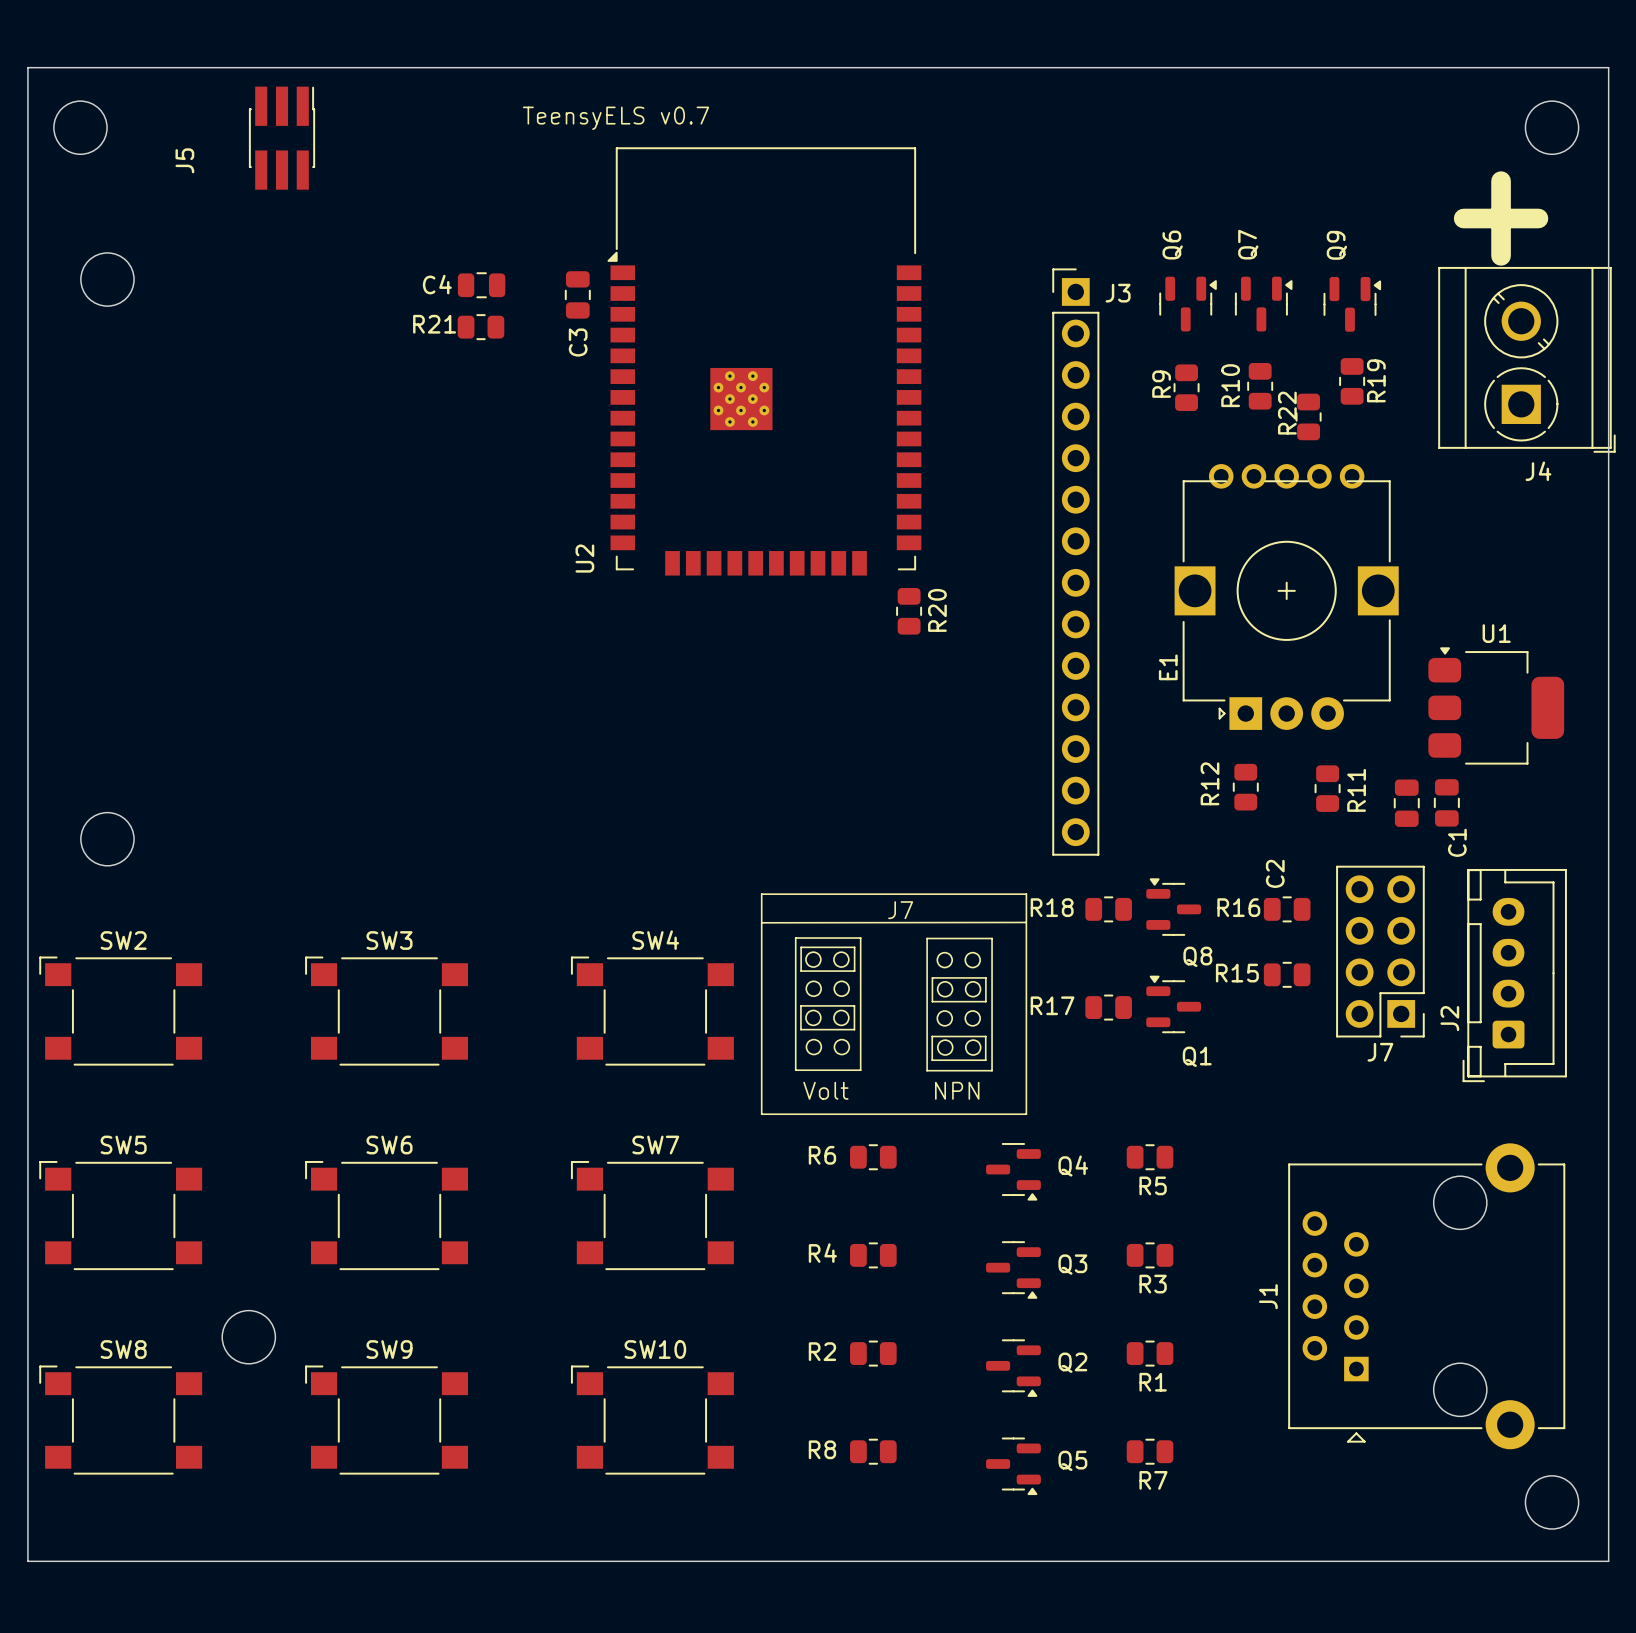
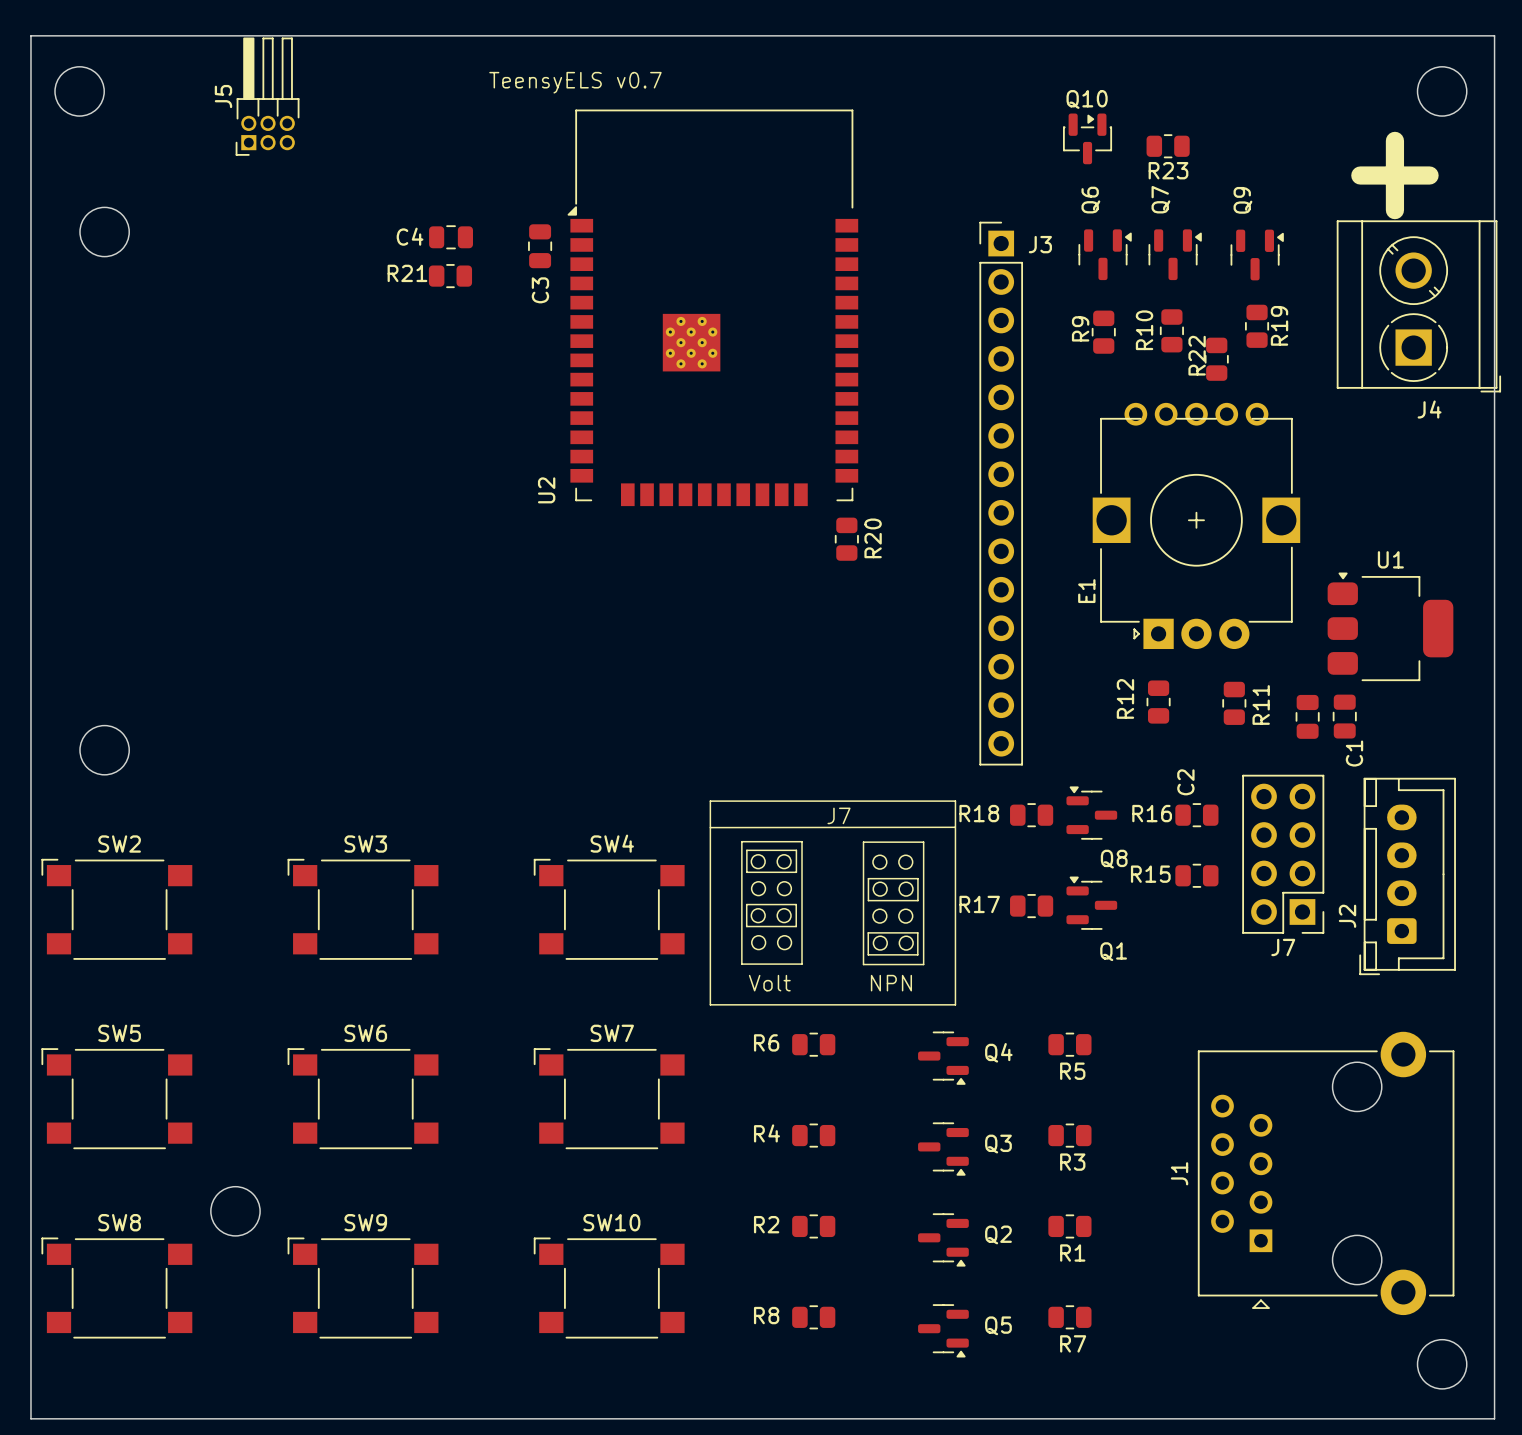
J5 footprint: [248, 86, 316, 190] -> [235, 37, 300, 156]
J5 name position: J5 (184, 160) -> J5 (223, 96)
Q10: none -> (1087, 138)
R23: none -> (1168, 146)

